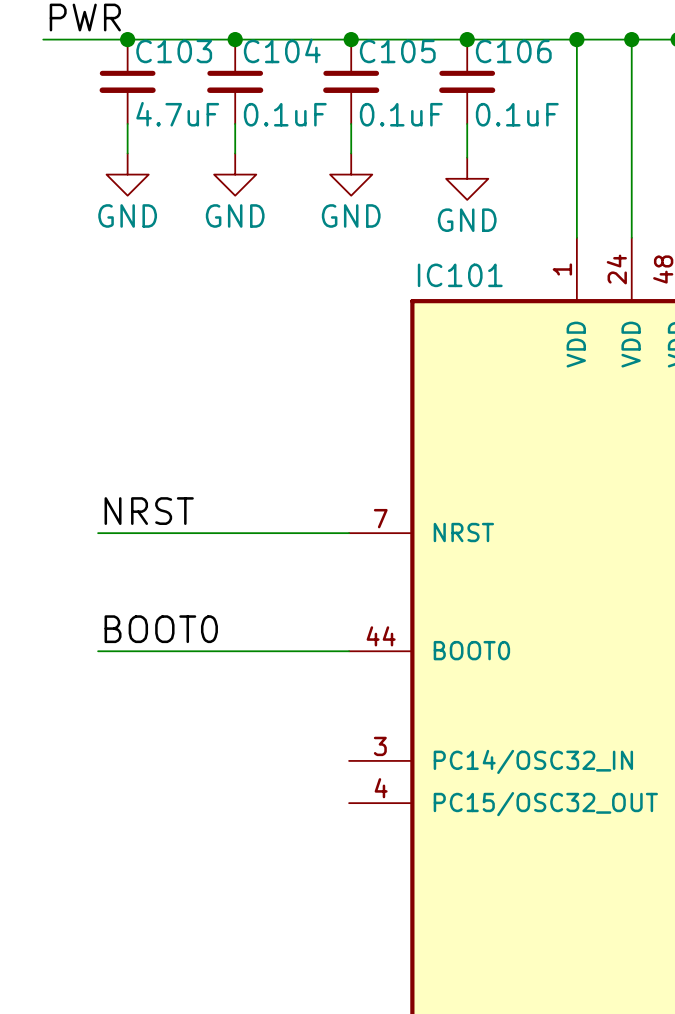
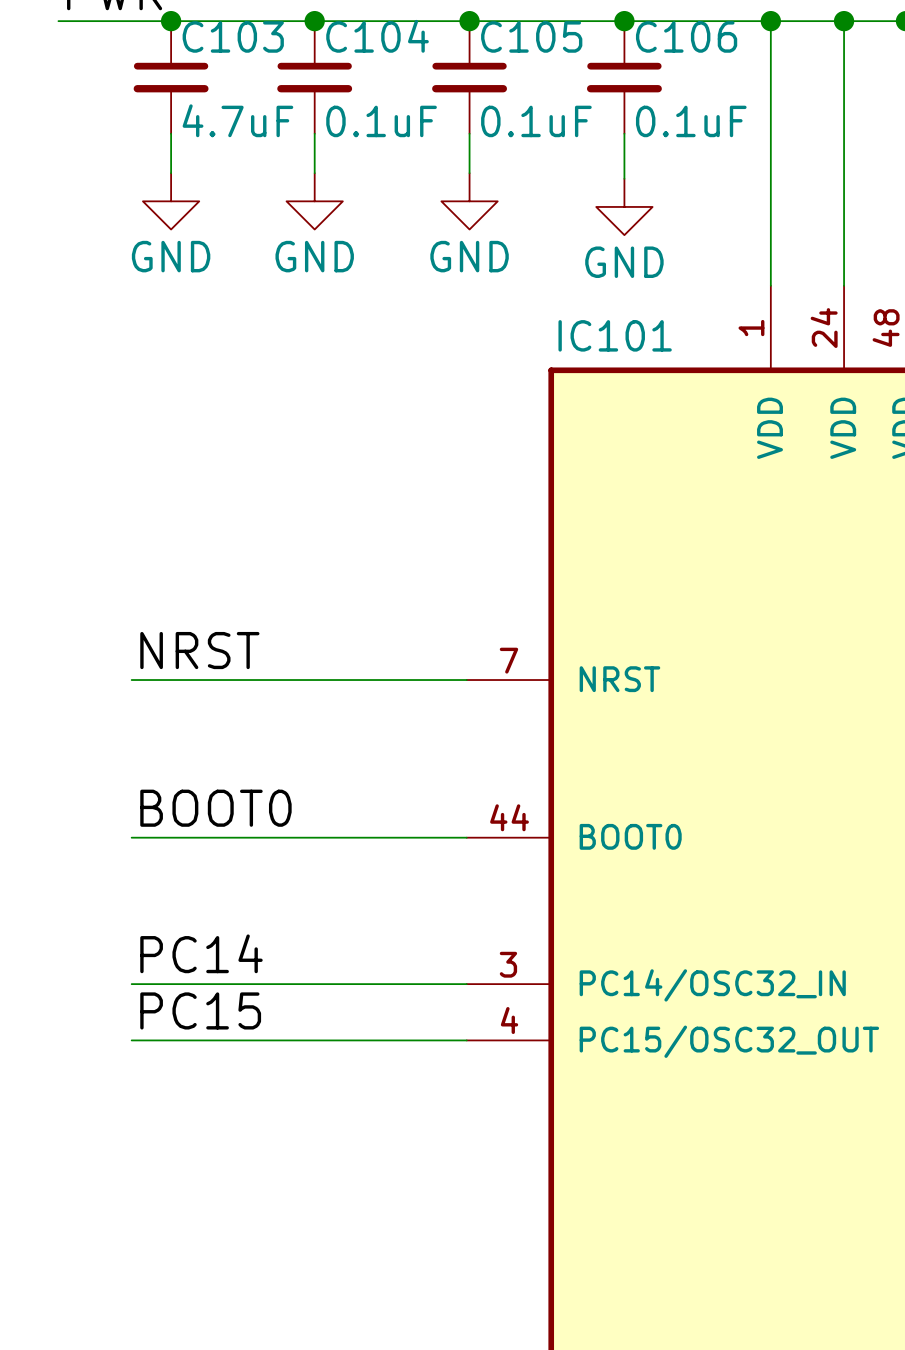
label: none -> PC14 (201, 953)
wire: none -> (131, 984) (466, 984)
label: none -> PC15 (200, 1010)
wire: none -> (131, 1040) (466, 1040)

